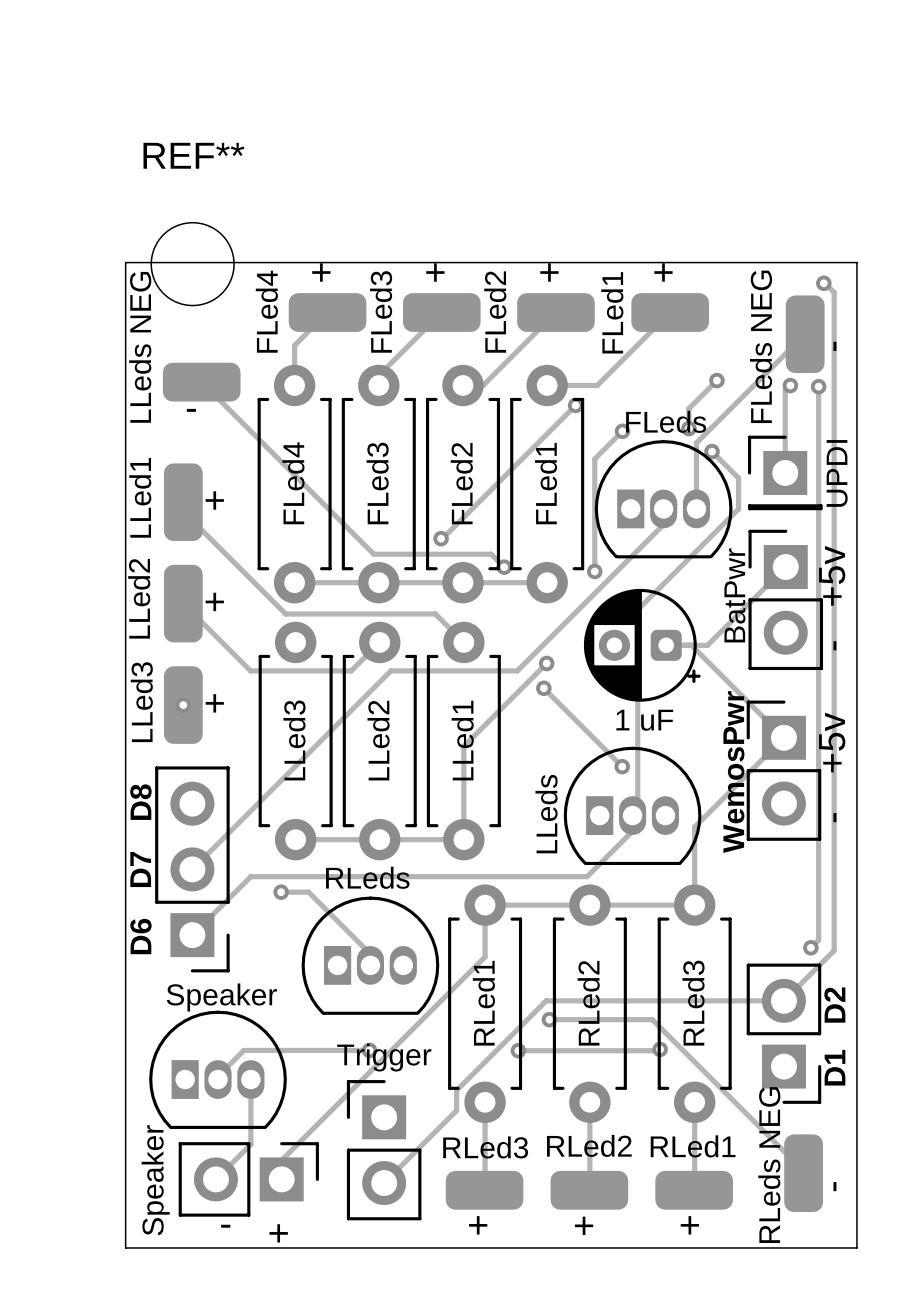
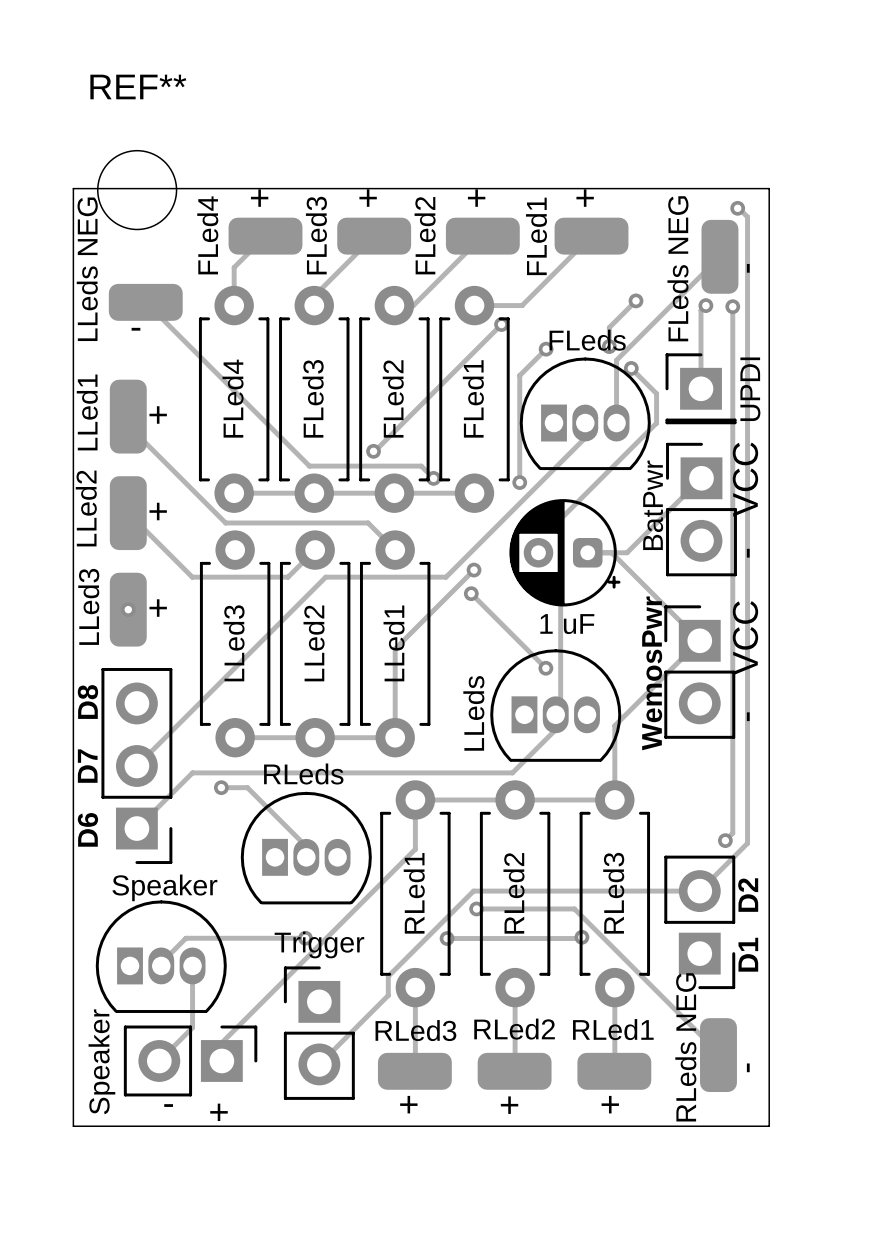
text: +5v (832, 575) -> VCC (745, 479)
text: +5v (832, 742) -> VCC (745, 638)

